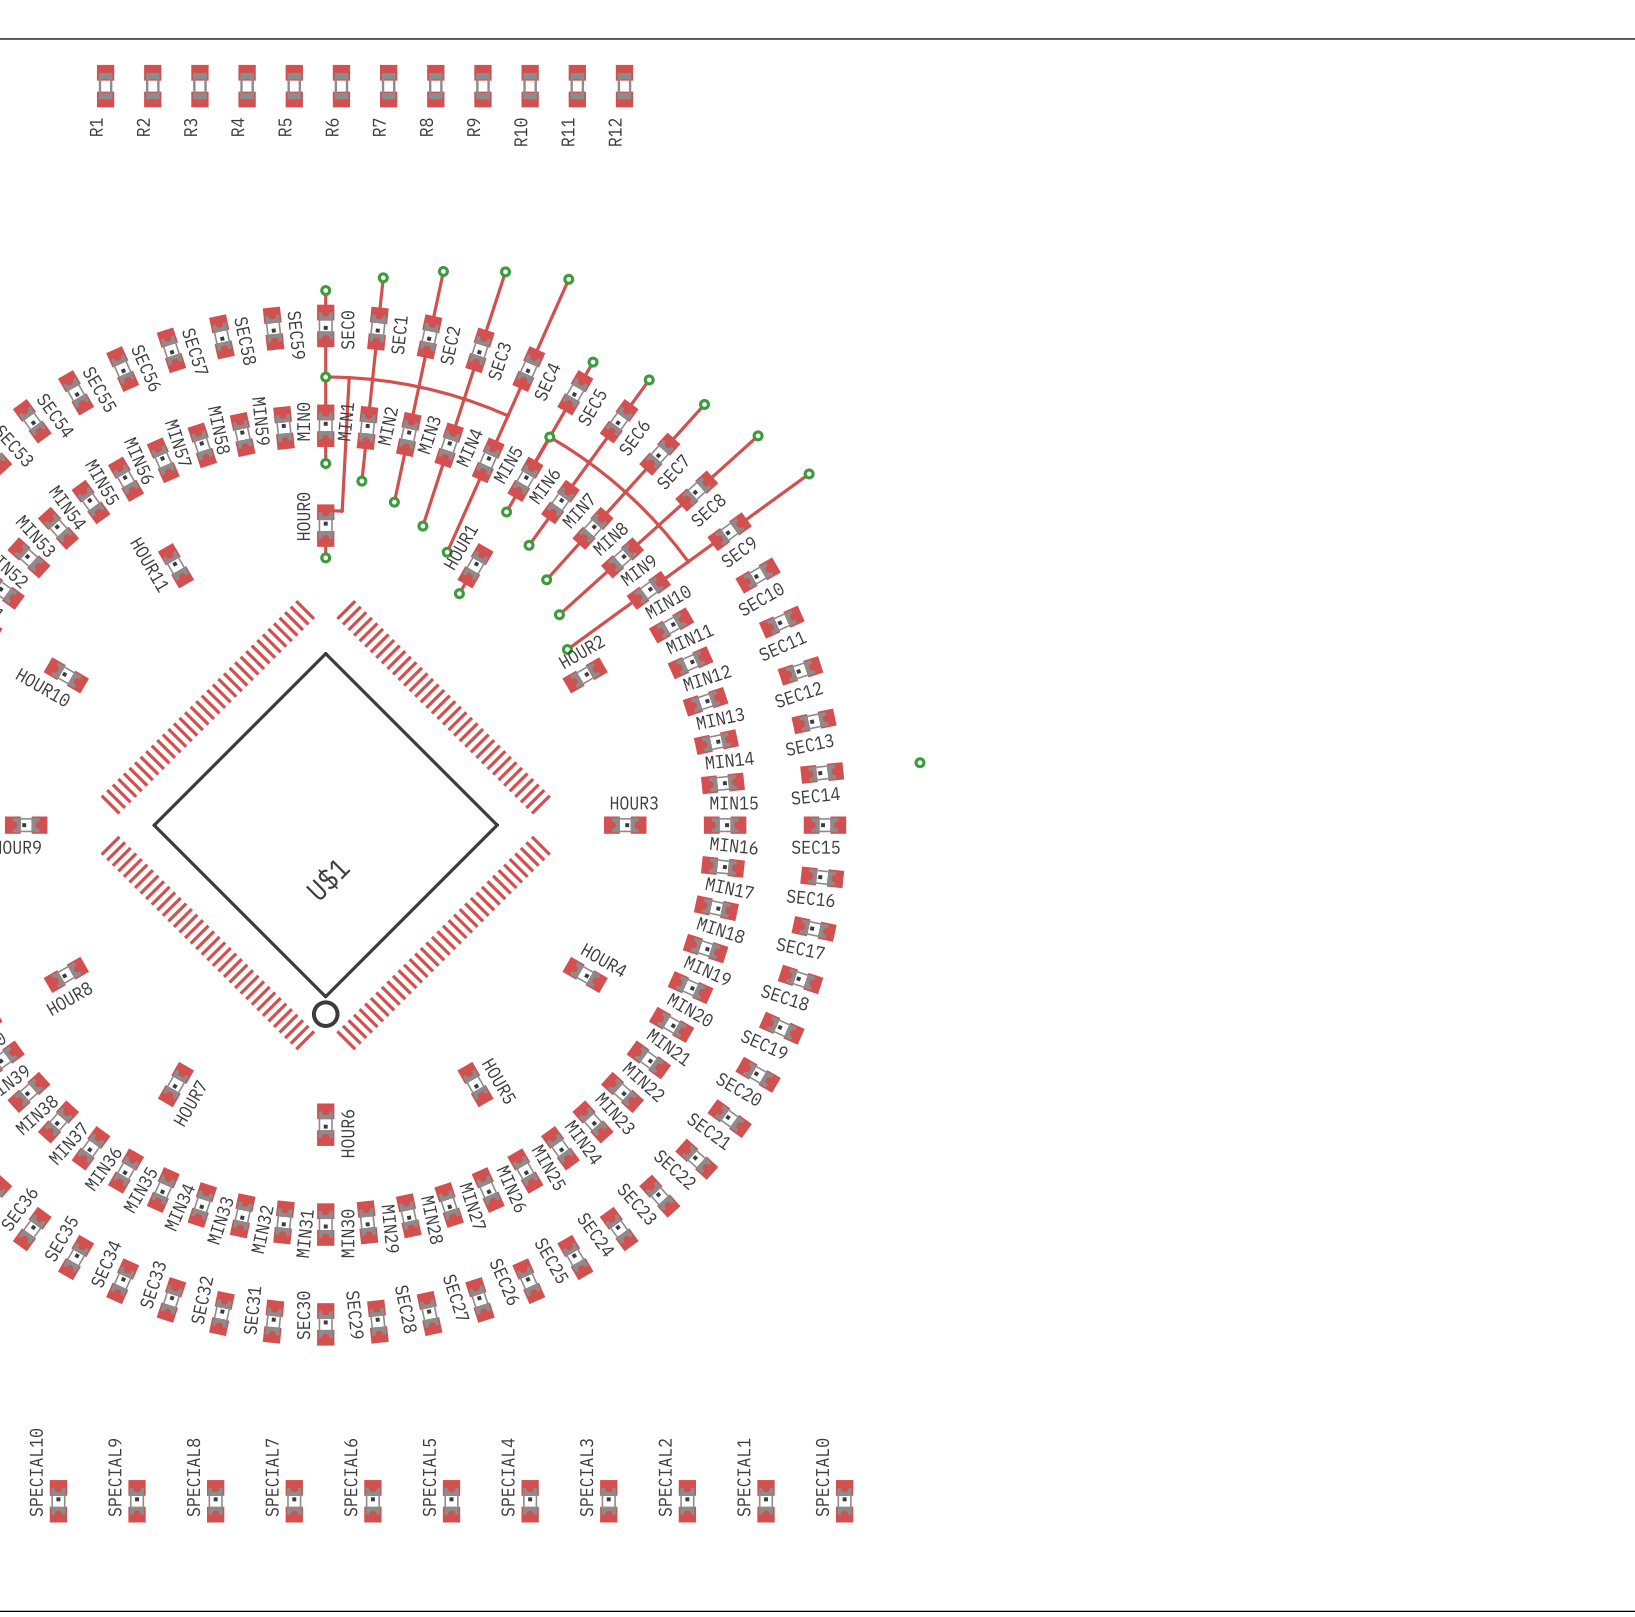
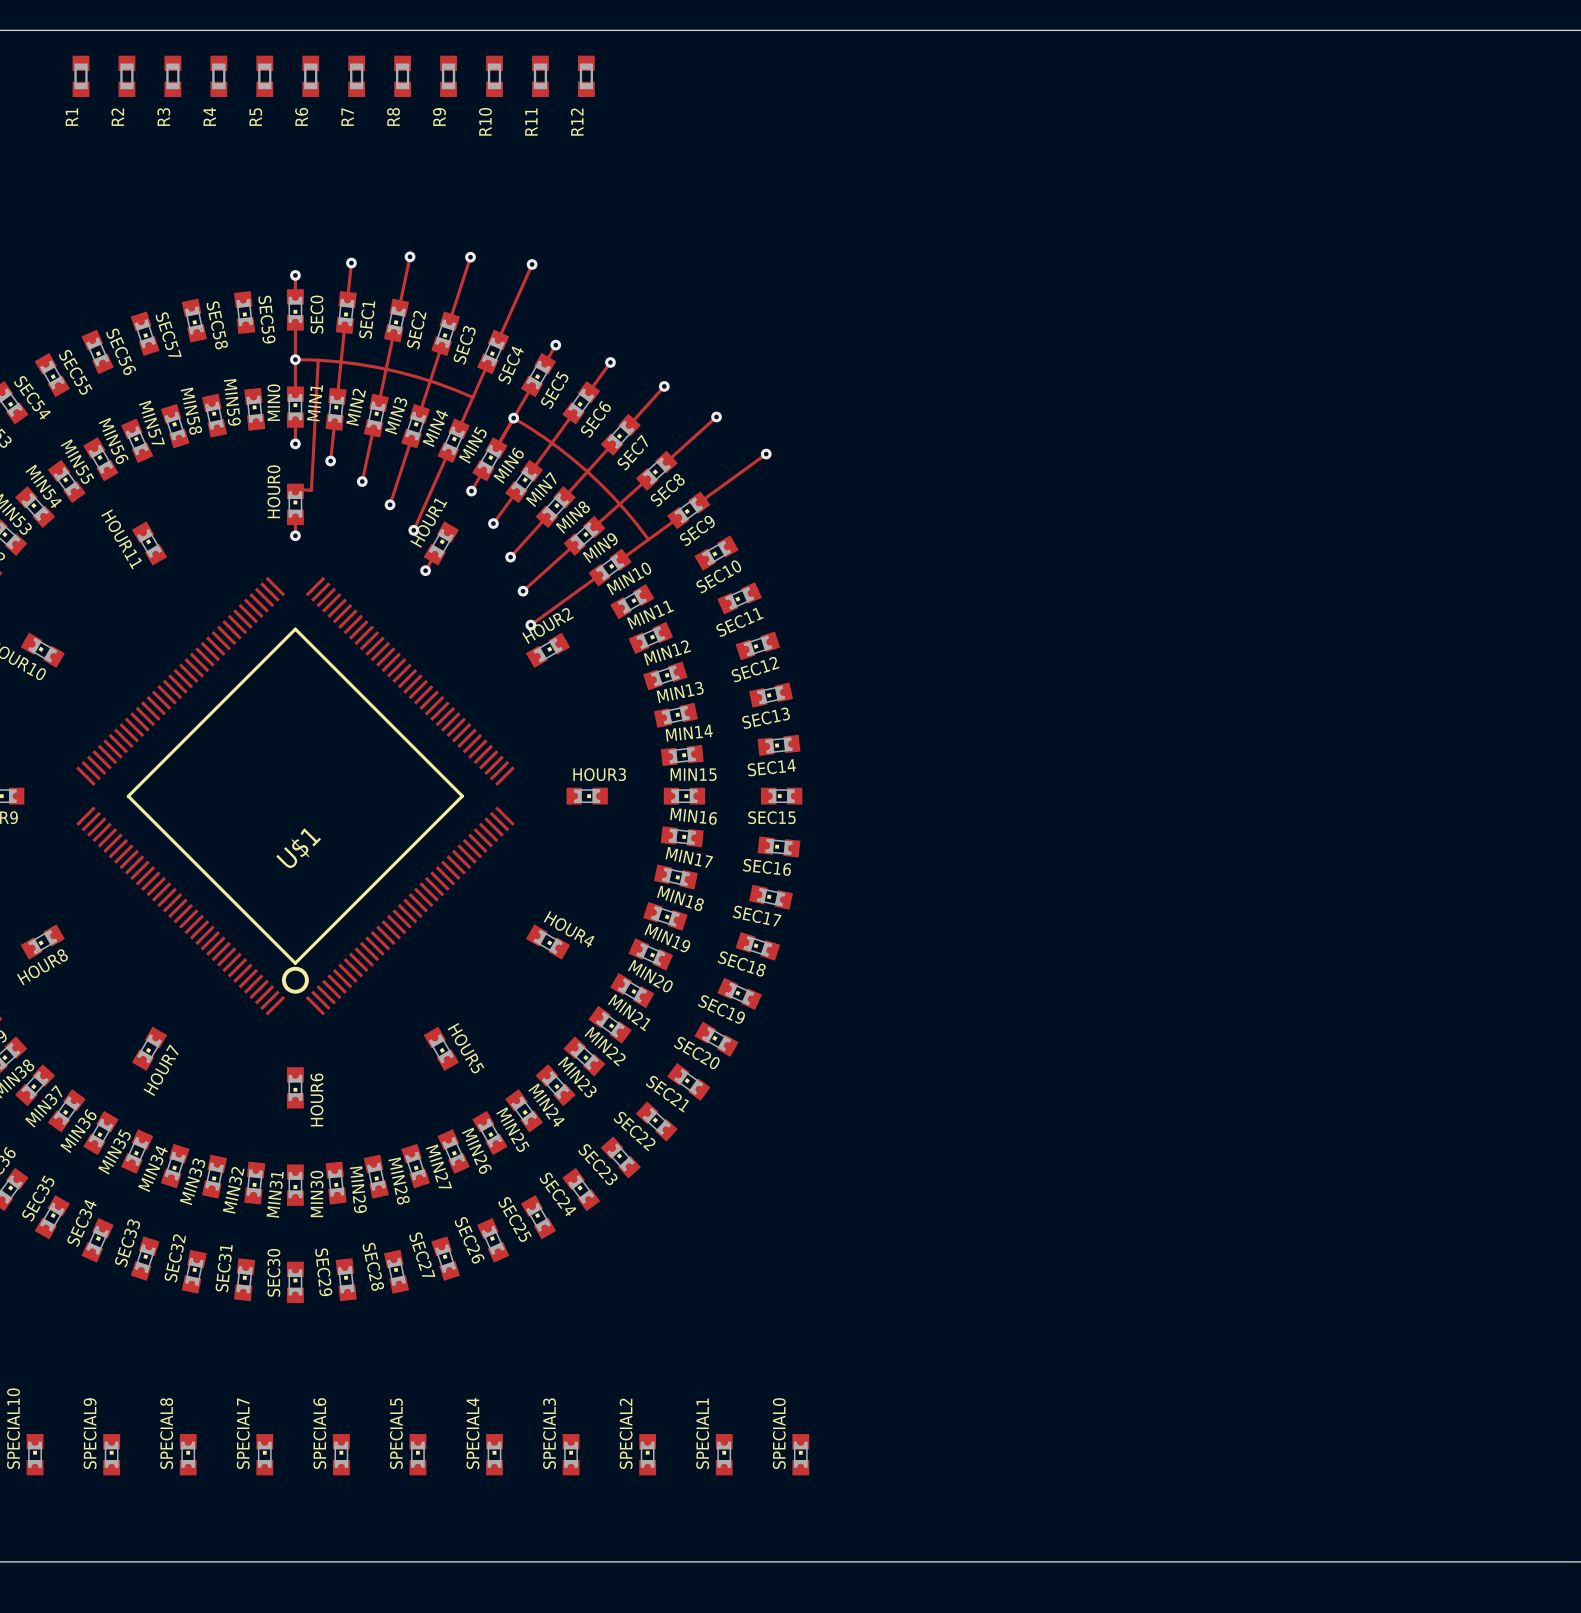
via: (919, 762) -> none

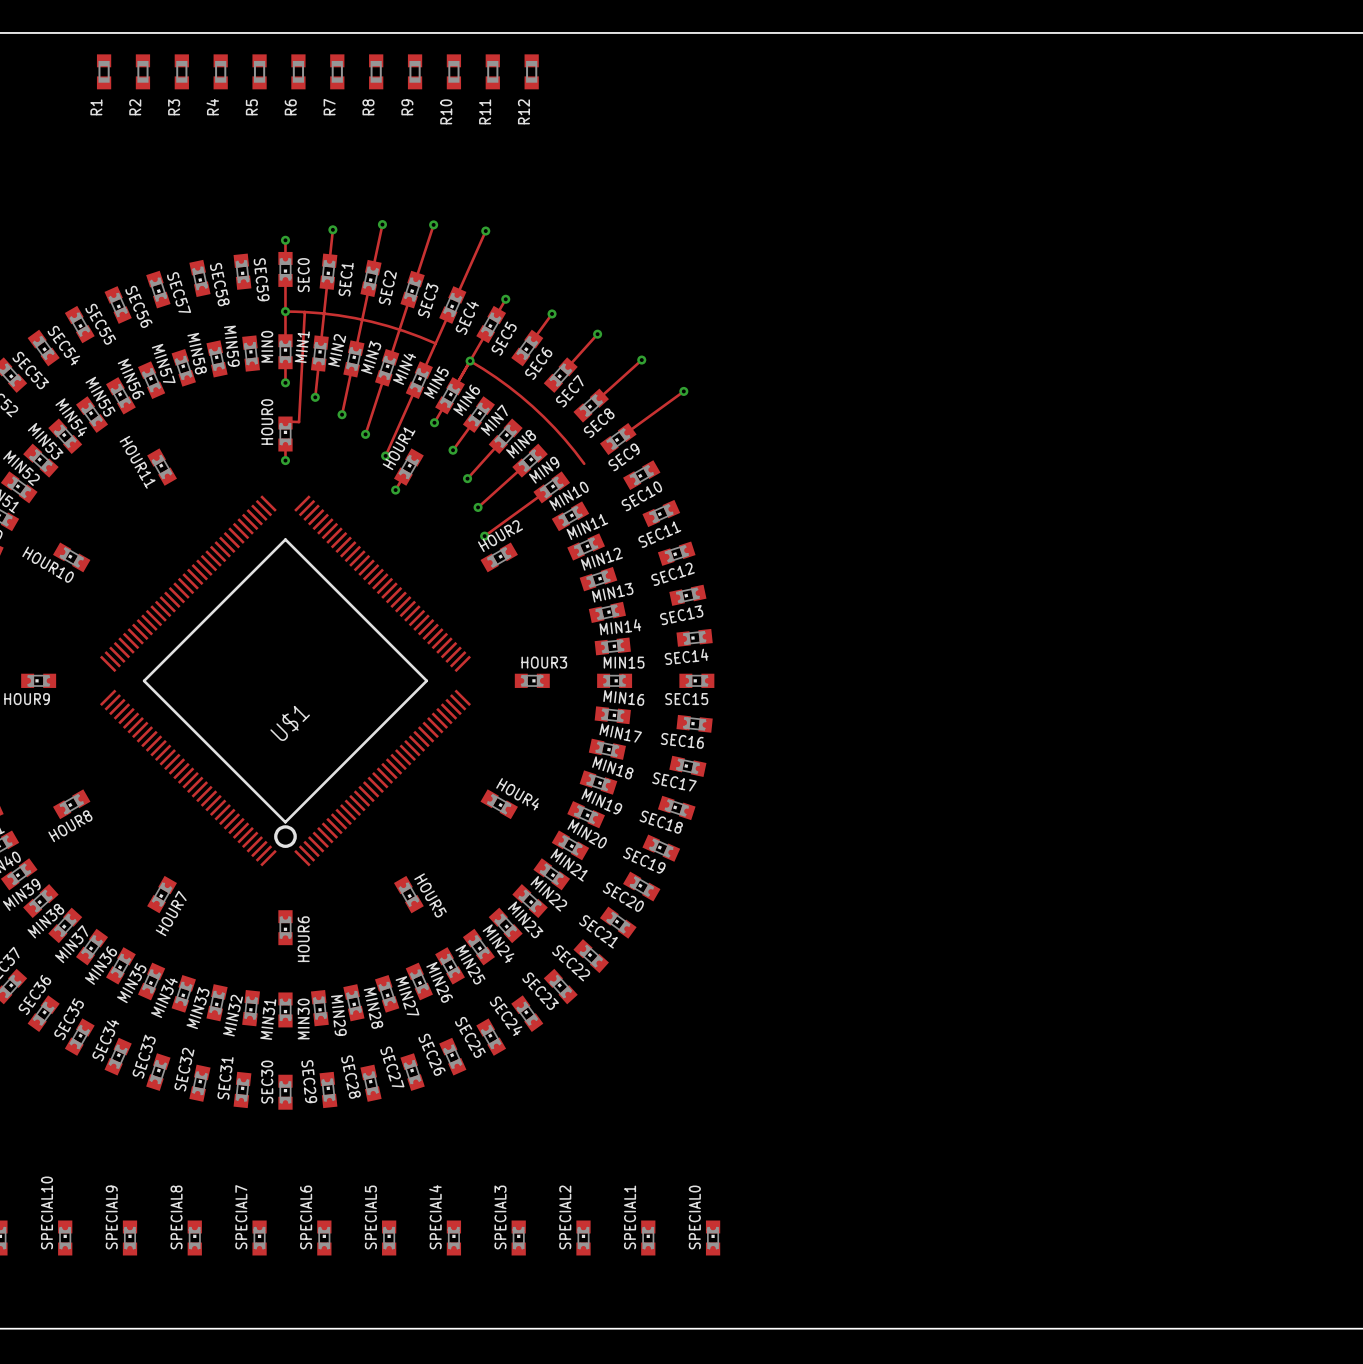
track: (573, 413) (531, 470) -> none
track: (612, 444) (564, 497) -> none
track: (647, 479) (594, 527) -> none
track: (678, 517) (620, 559) -> none

